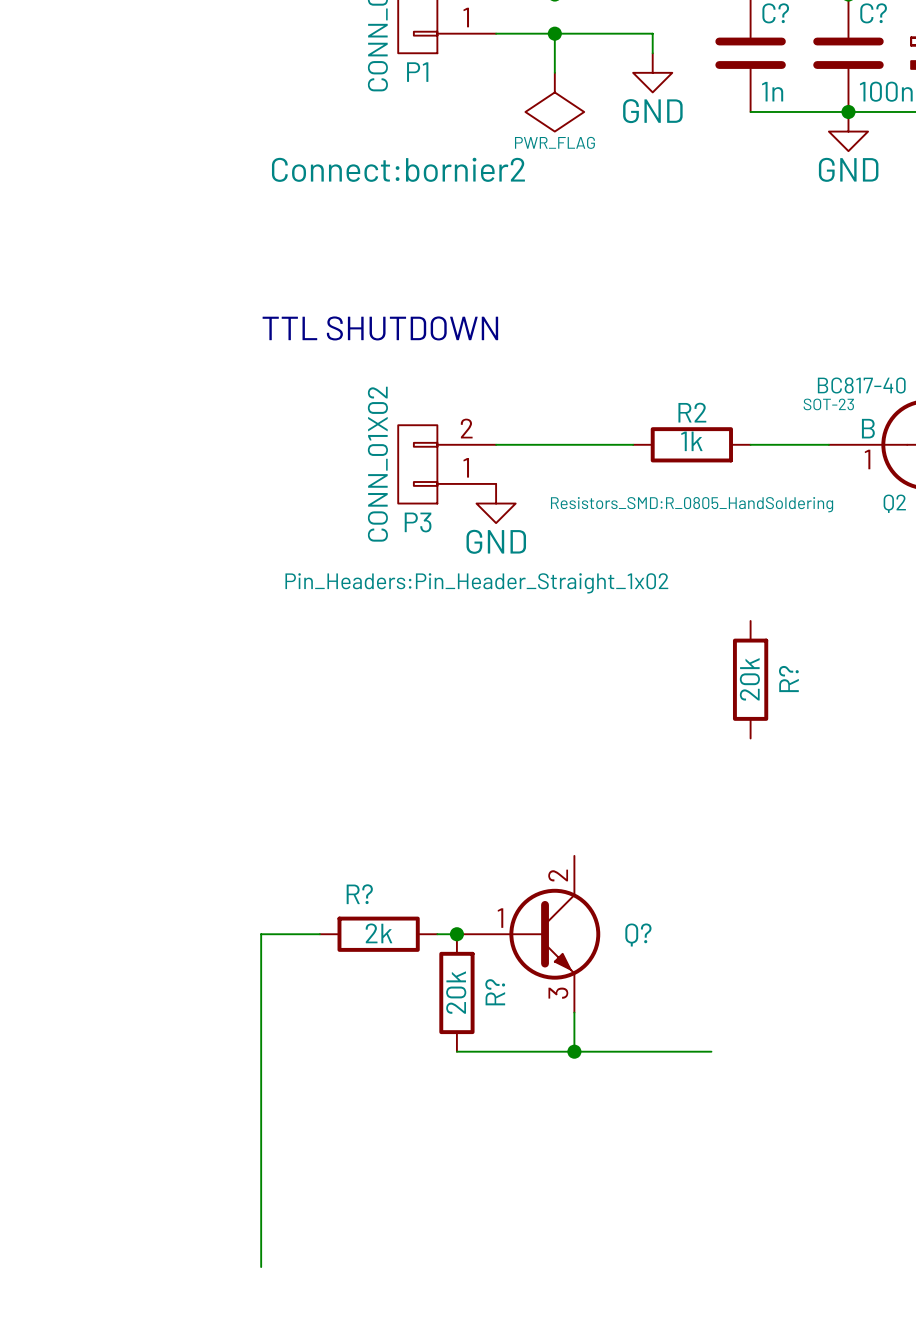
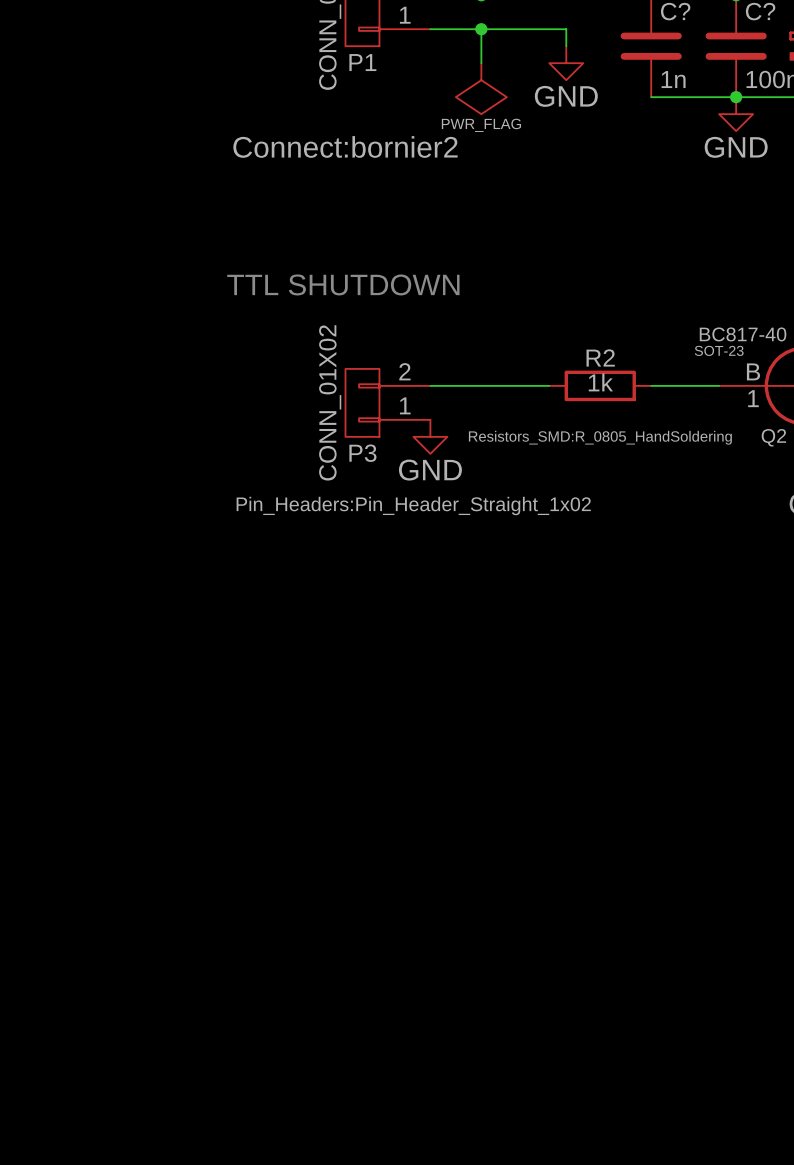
R?: 20k (750, 679) -> none
wire: (319, 934) (261, 934) (261, 1267) -> none
R?: 2k (378, 934) -> none
wire: (437, 934) (456, 934) -> none
junction: (456, 934) -> none
Q?: (528, 934) -> none
R?: 20k (456, 992) -> none
wire: (574, 1012) (574, 1051) -> none
wire: (456, 1051) (711, 1051) -> none
junction: (574, 1051) -> none

